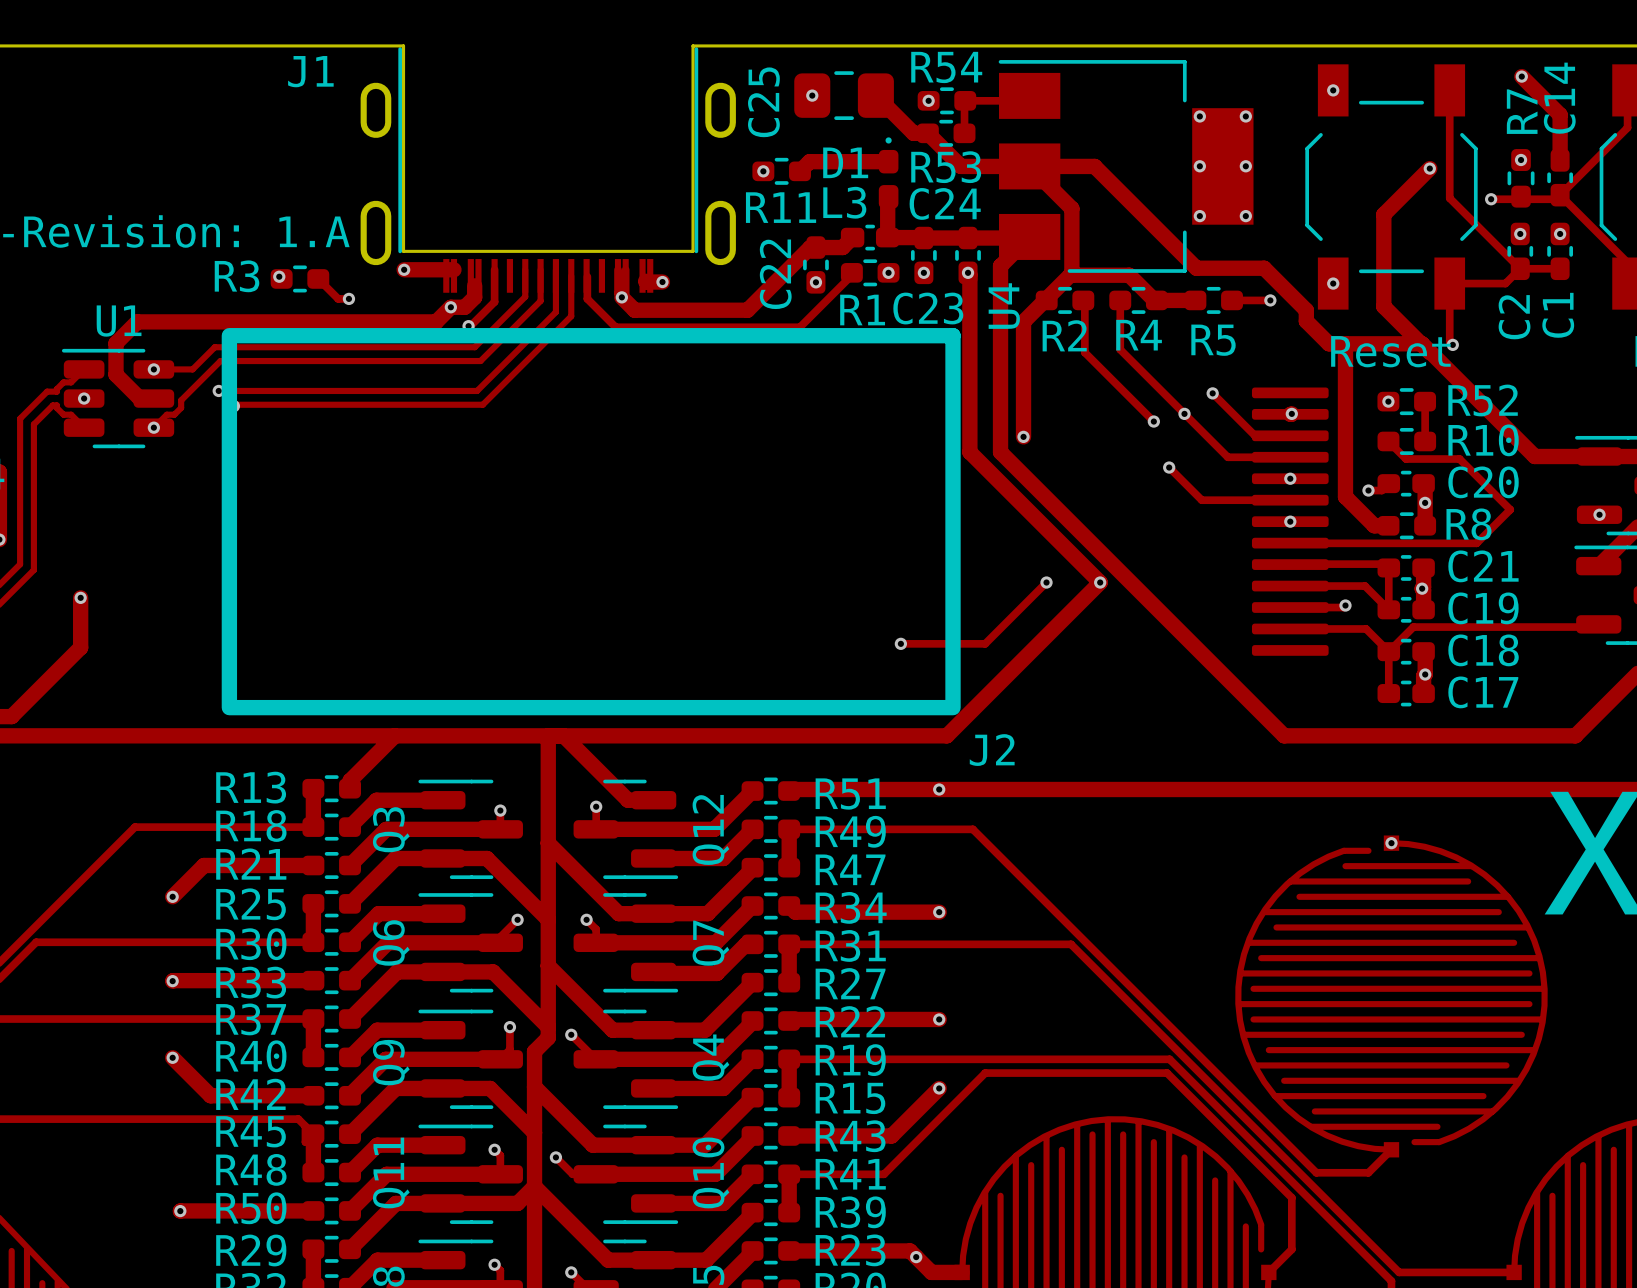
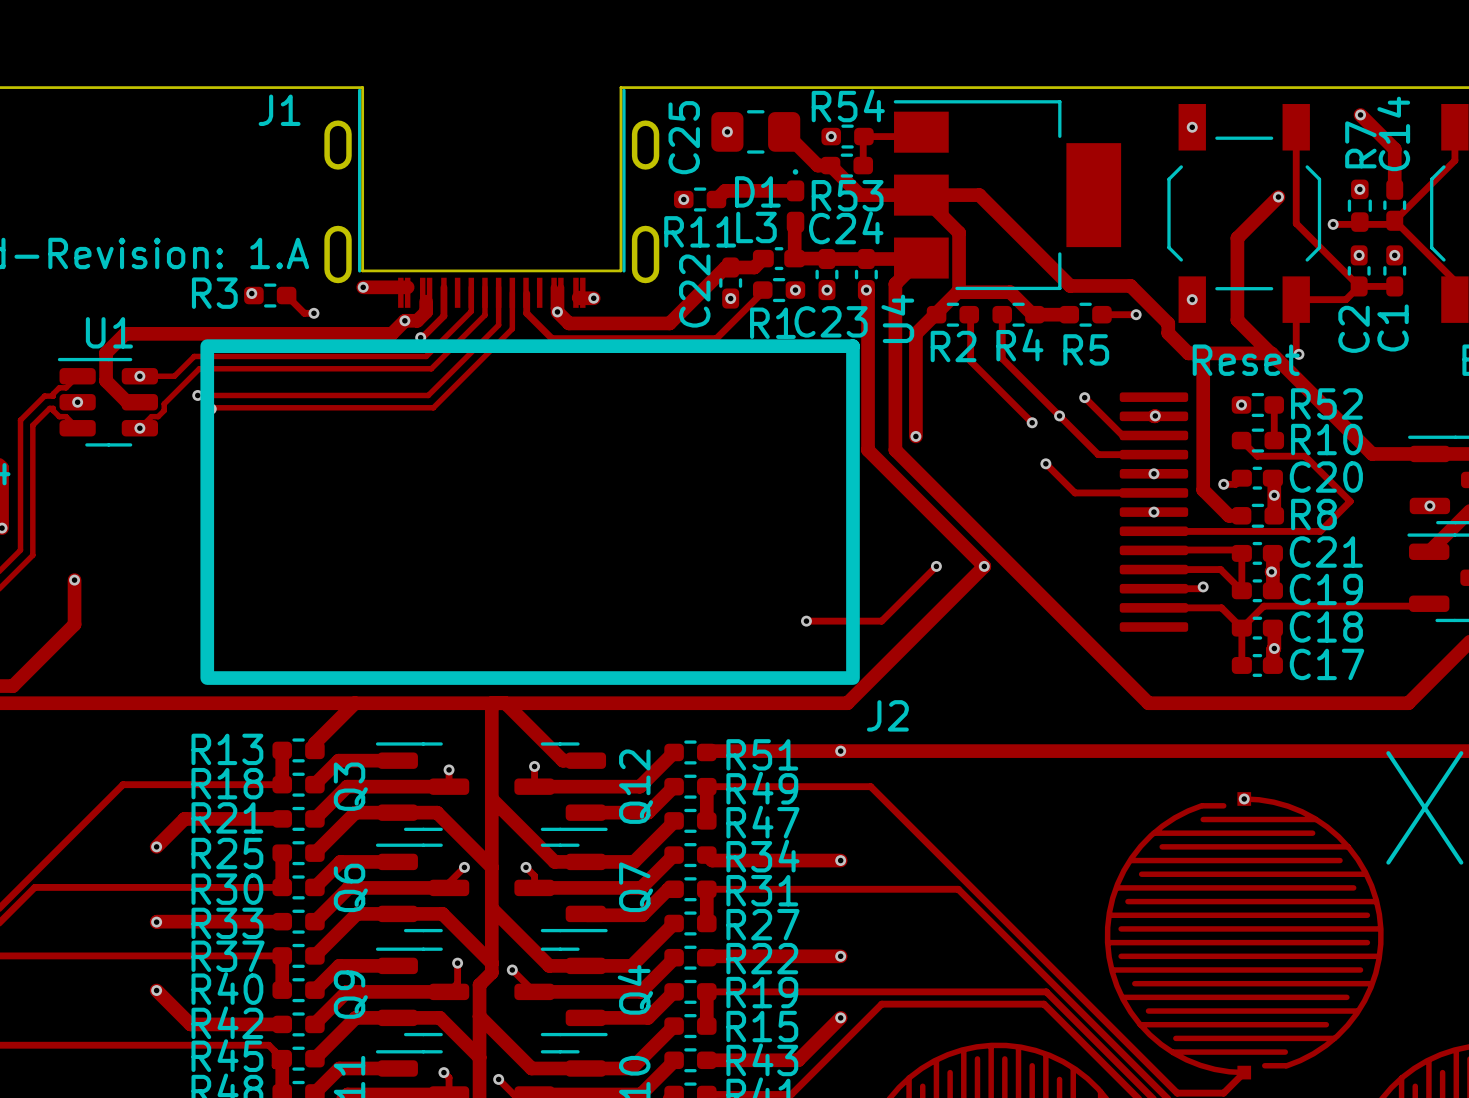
via: (1199, 116) -> none
via: (1245, 116) -> none
via: (1199, 166) -> none
via: (1245, 166) -> none
via: (1199, 216) -> none
via: (1245, 216) -> none

